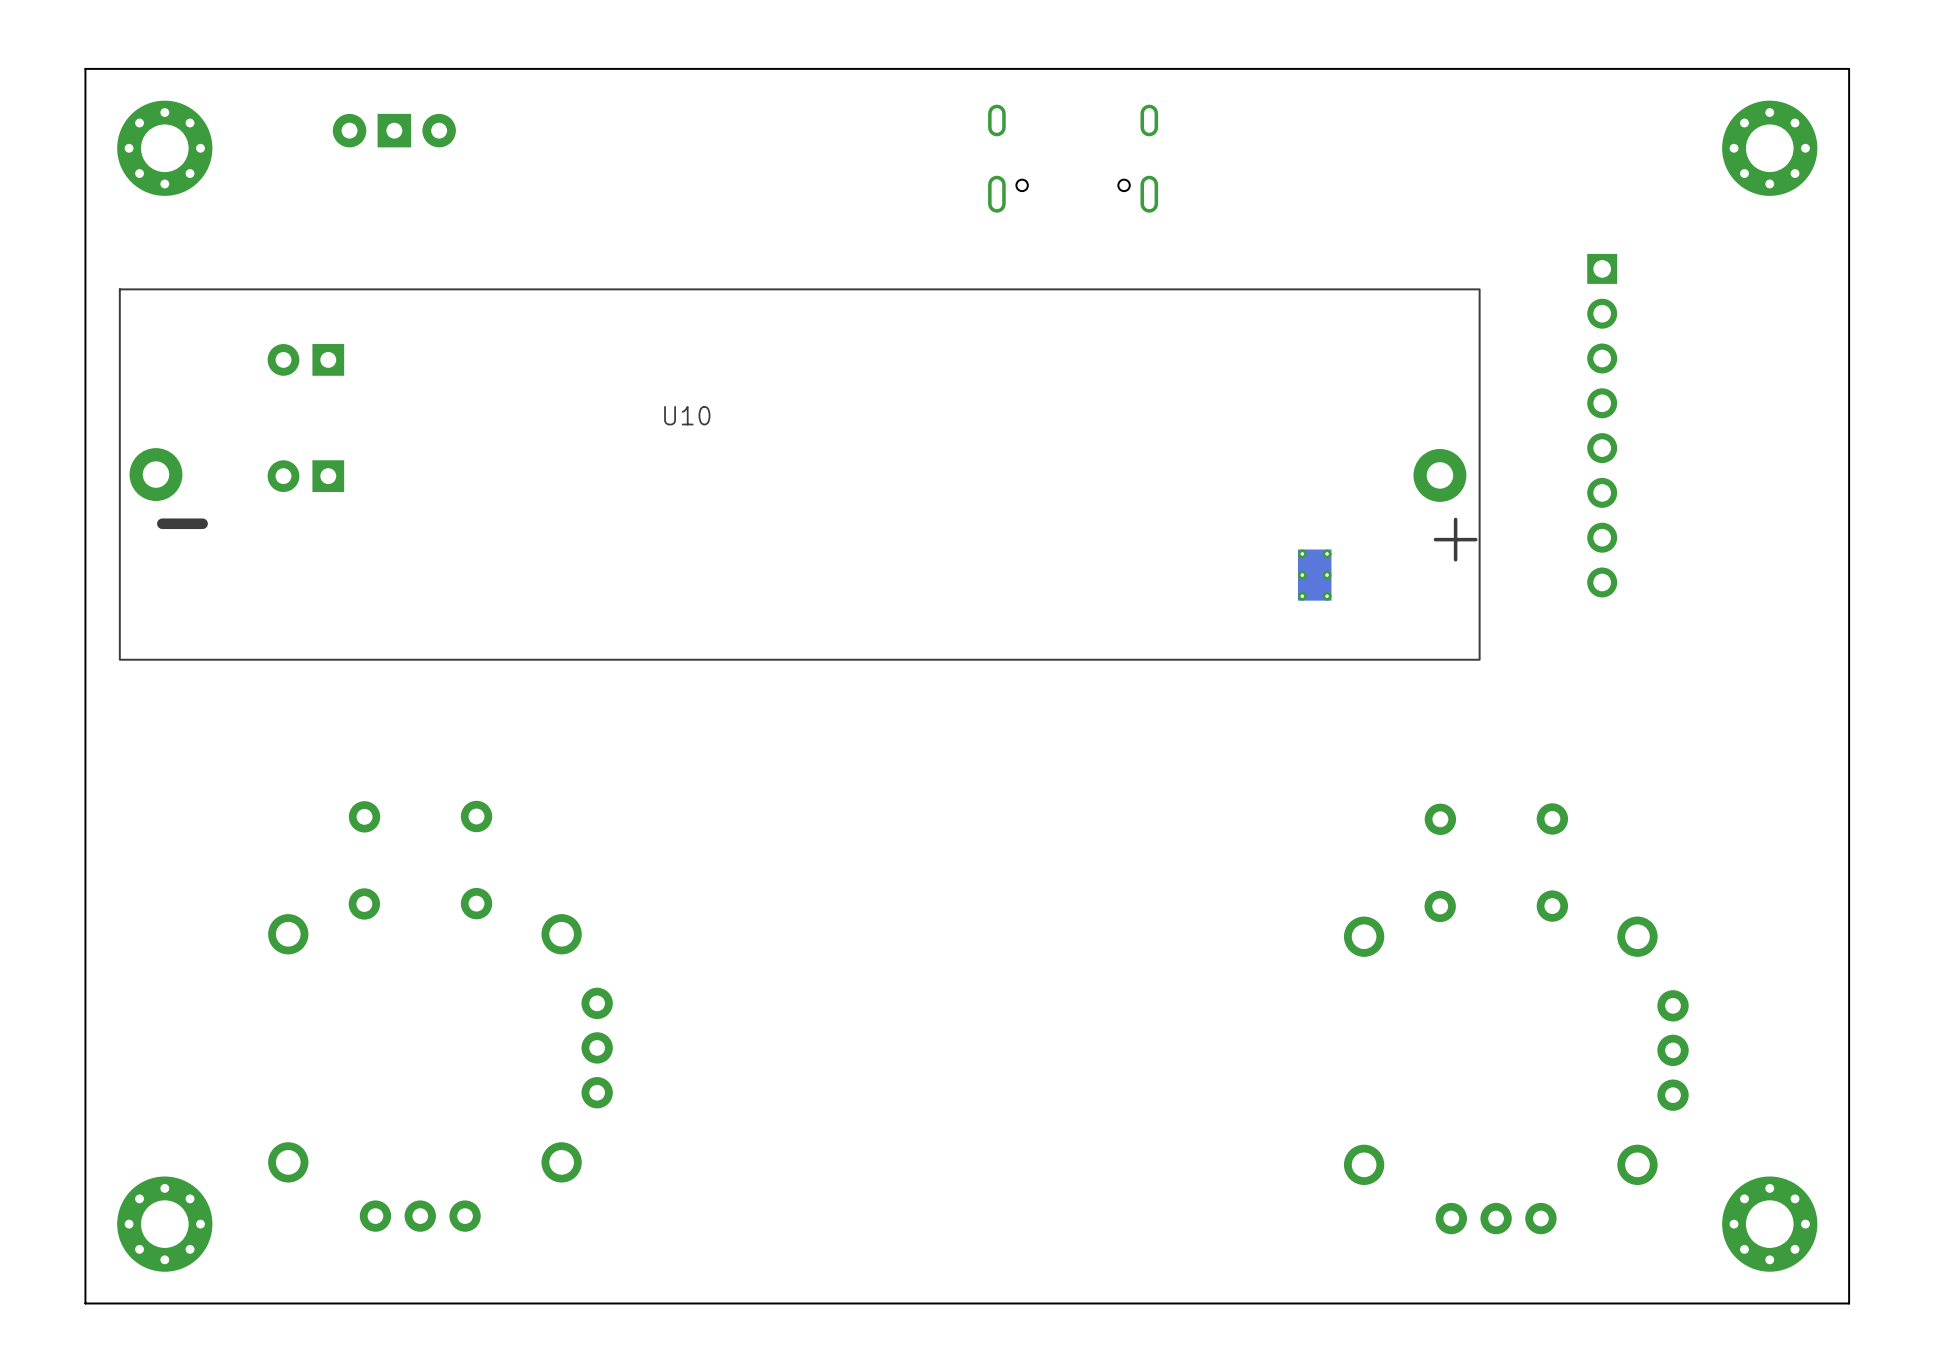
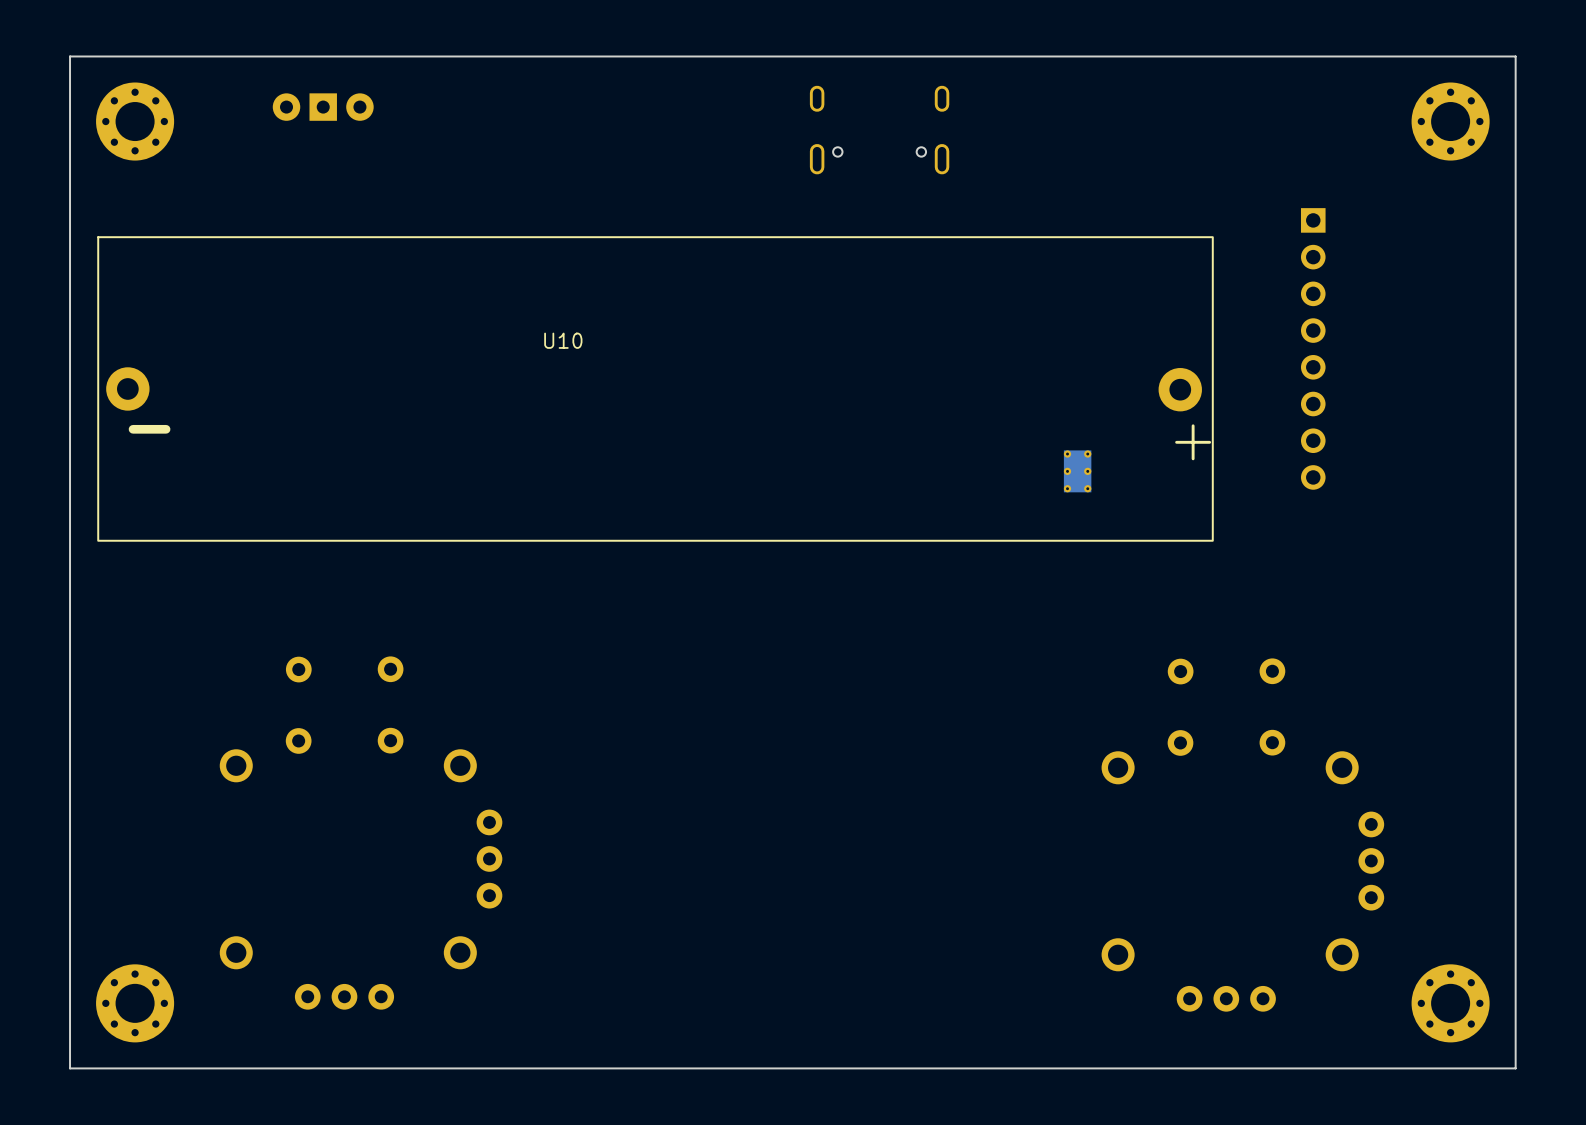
part: (305, 359) -> none
part: (305, 476) -> none

